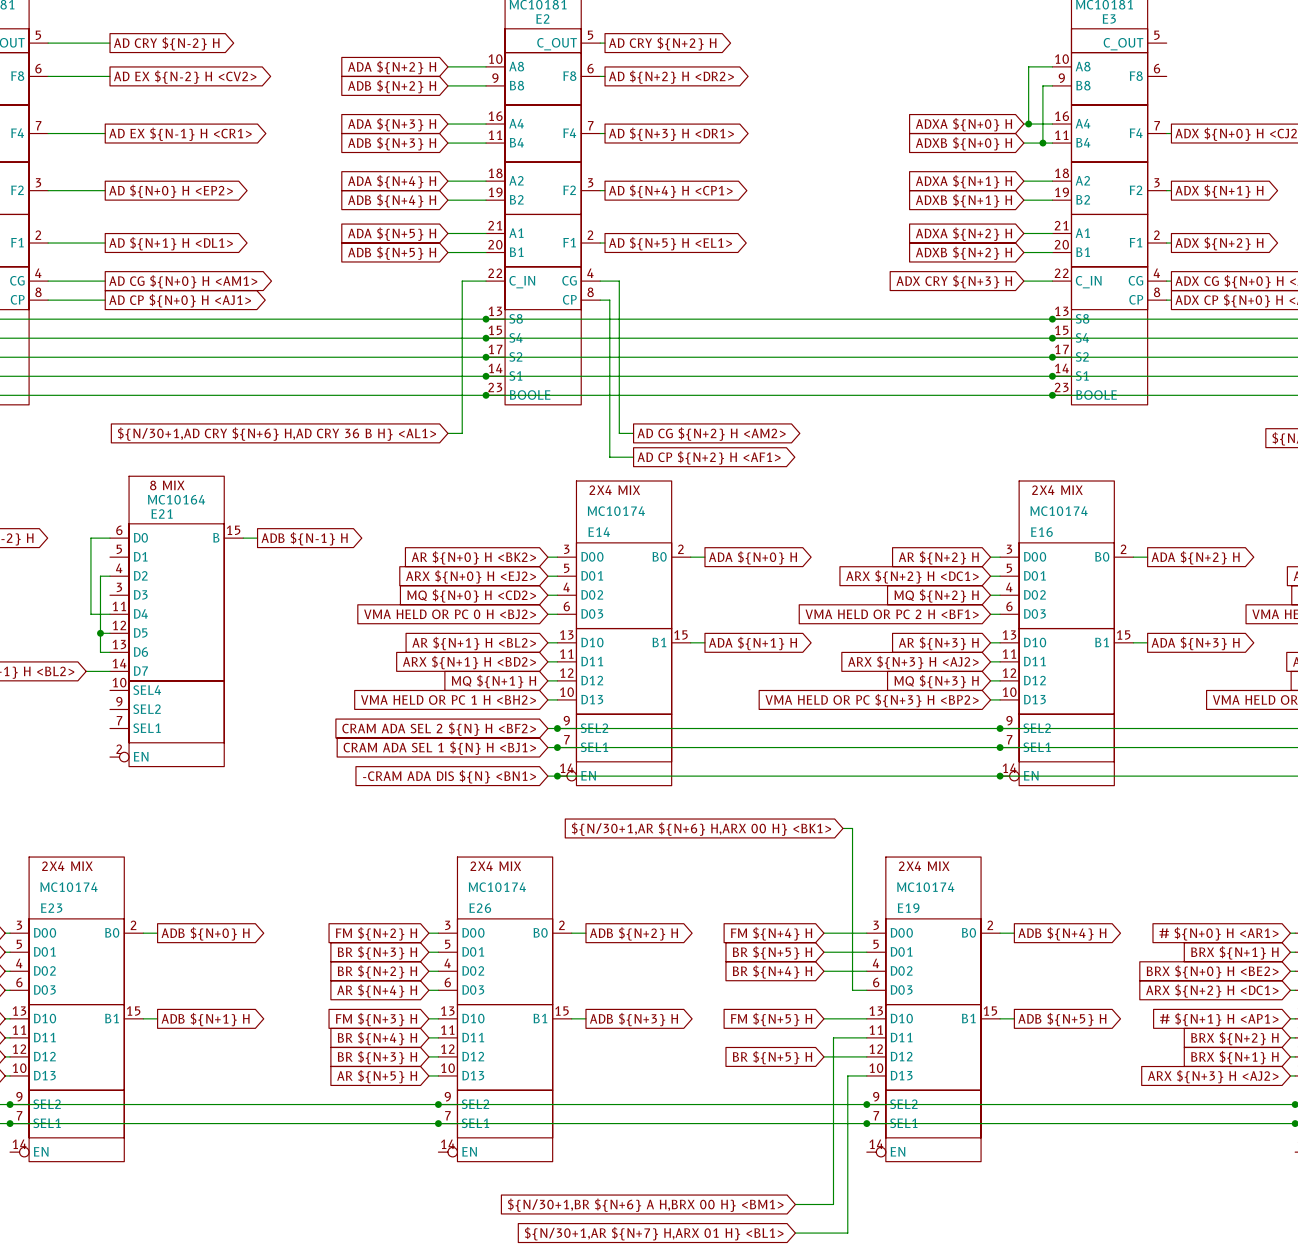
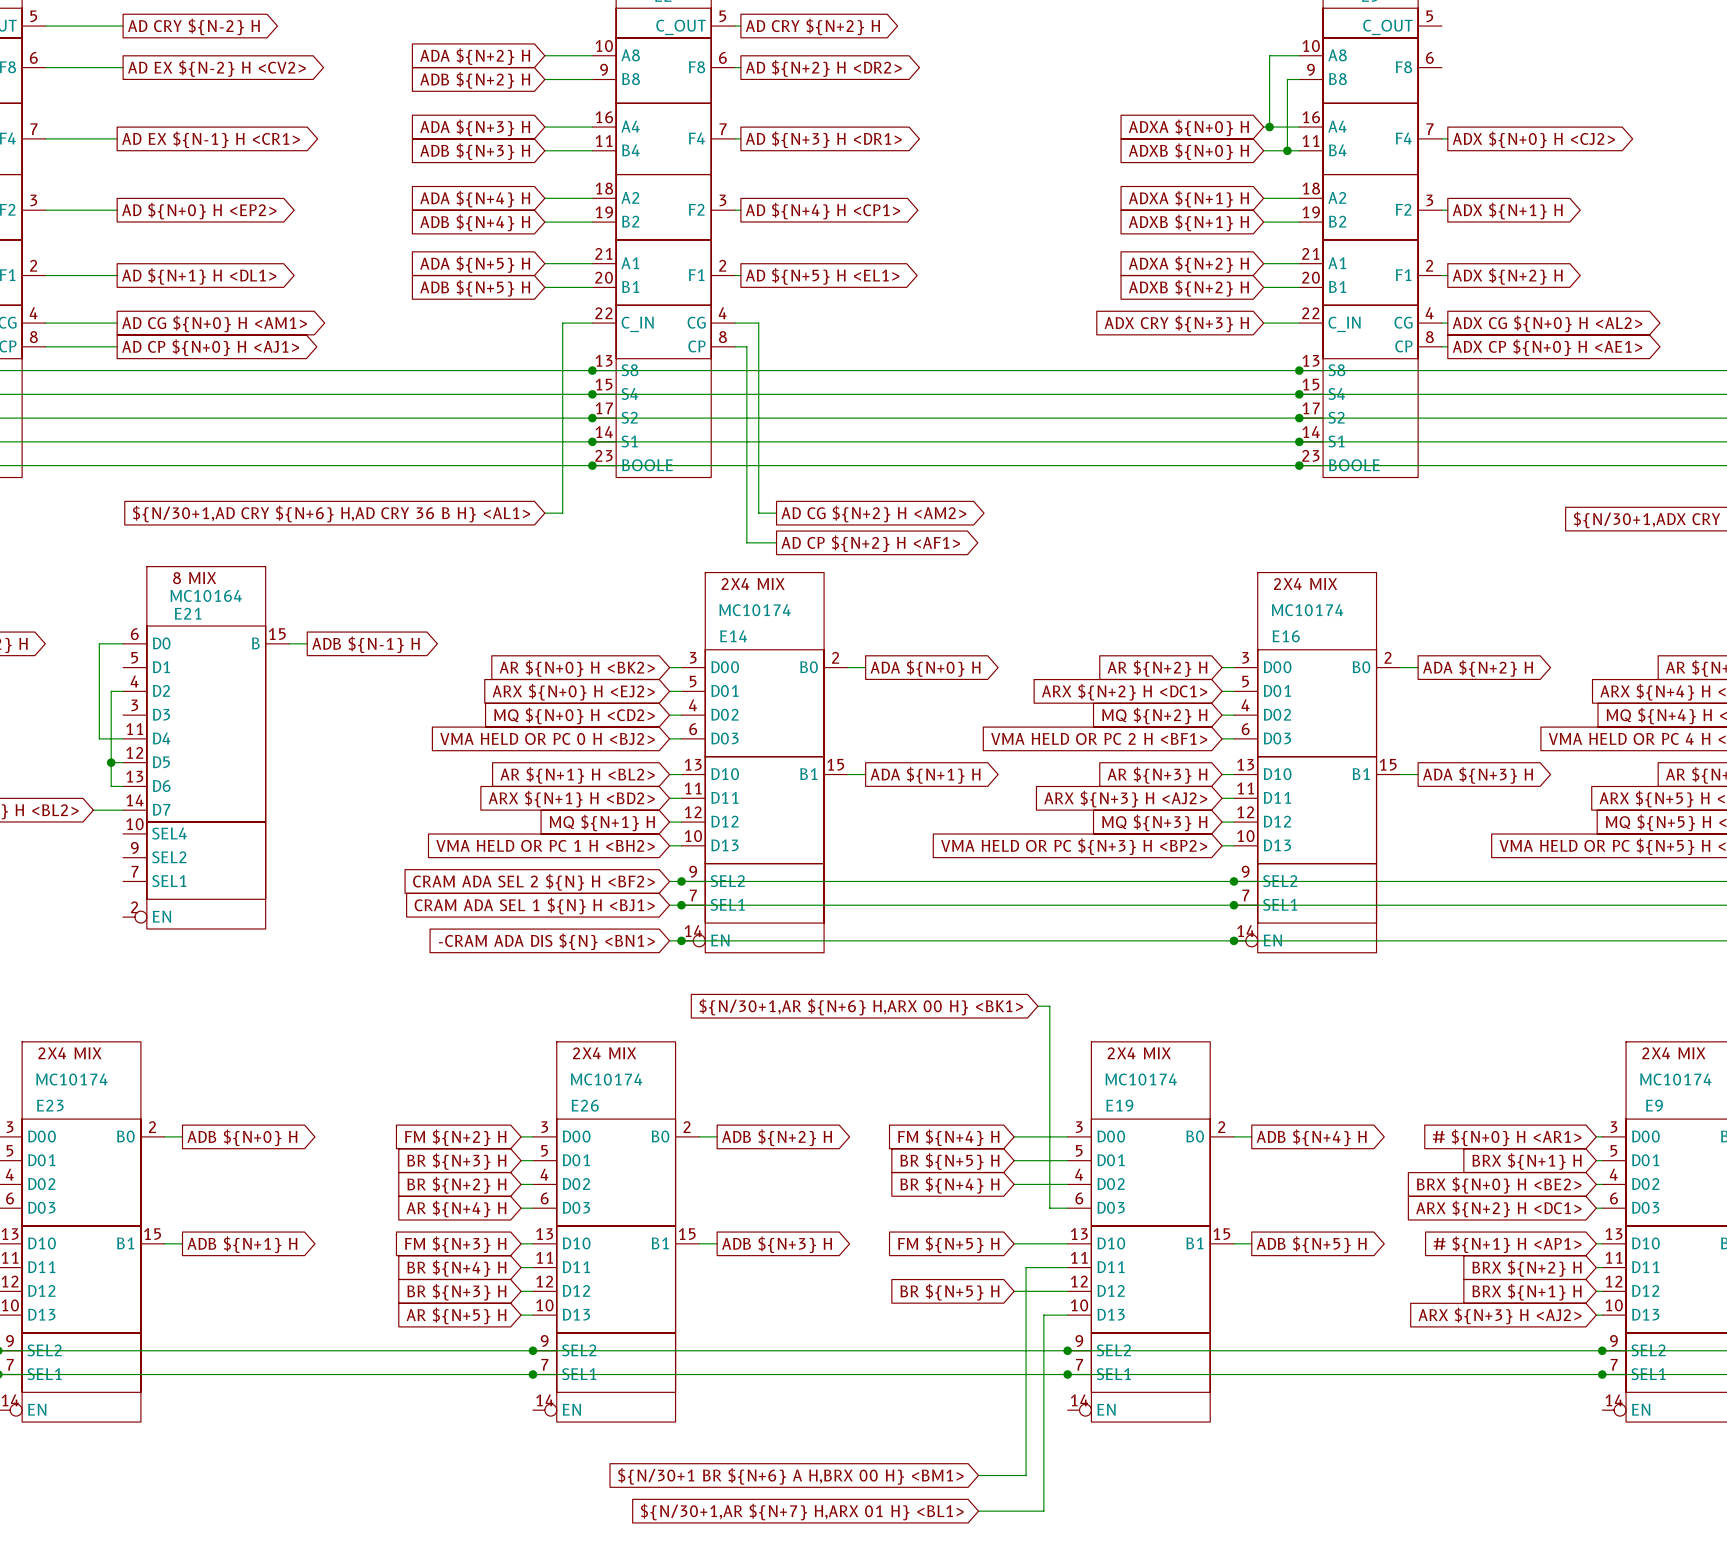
global label: ${N/30+1,BR ${N+6} A H,BRX 00 H} <BM1> (645, 1205) -> ${N/30+1 BR ${N+6} A H,BRX 00 H} <BM1> (790, 1476)

